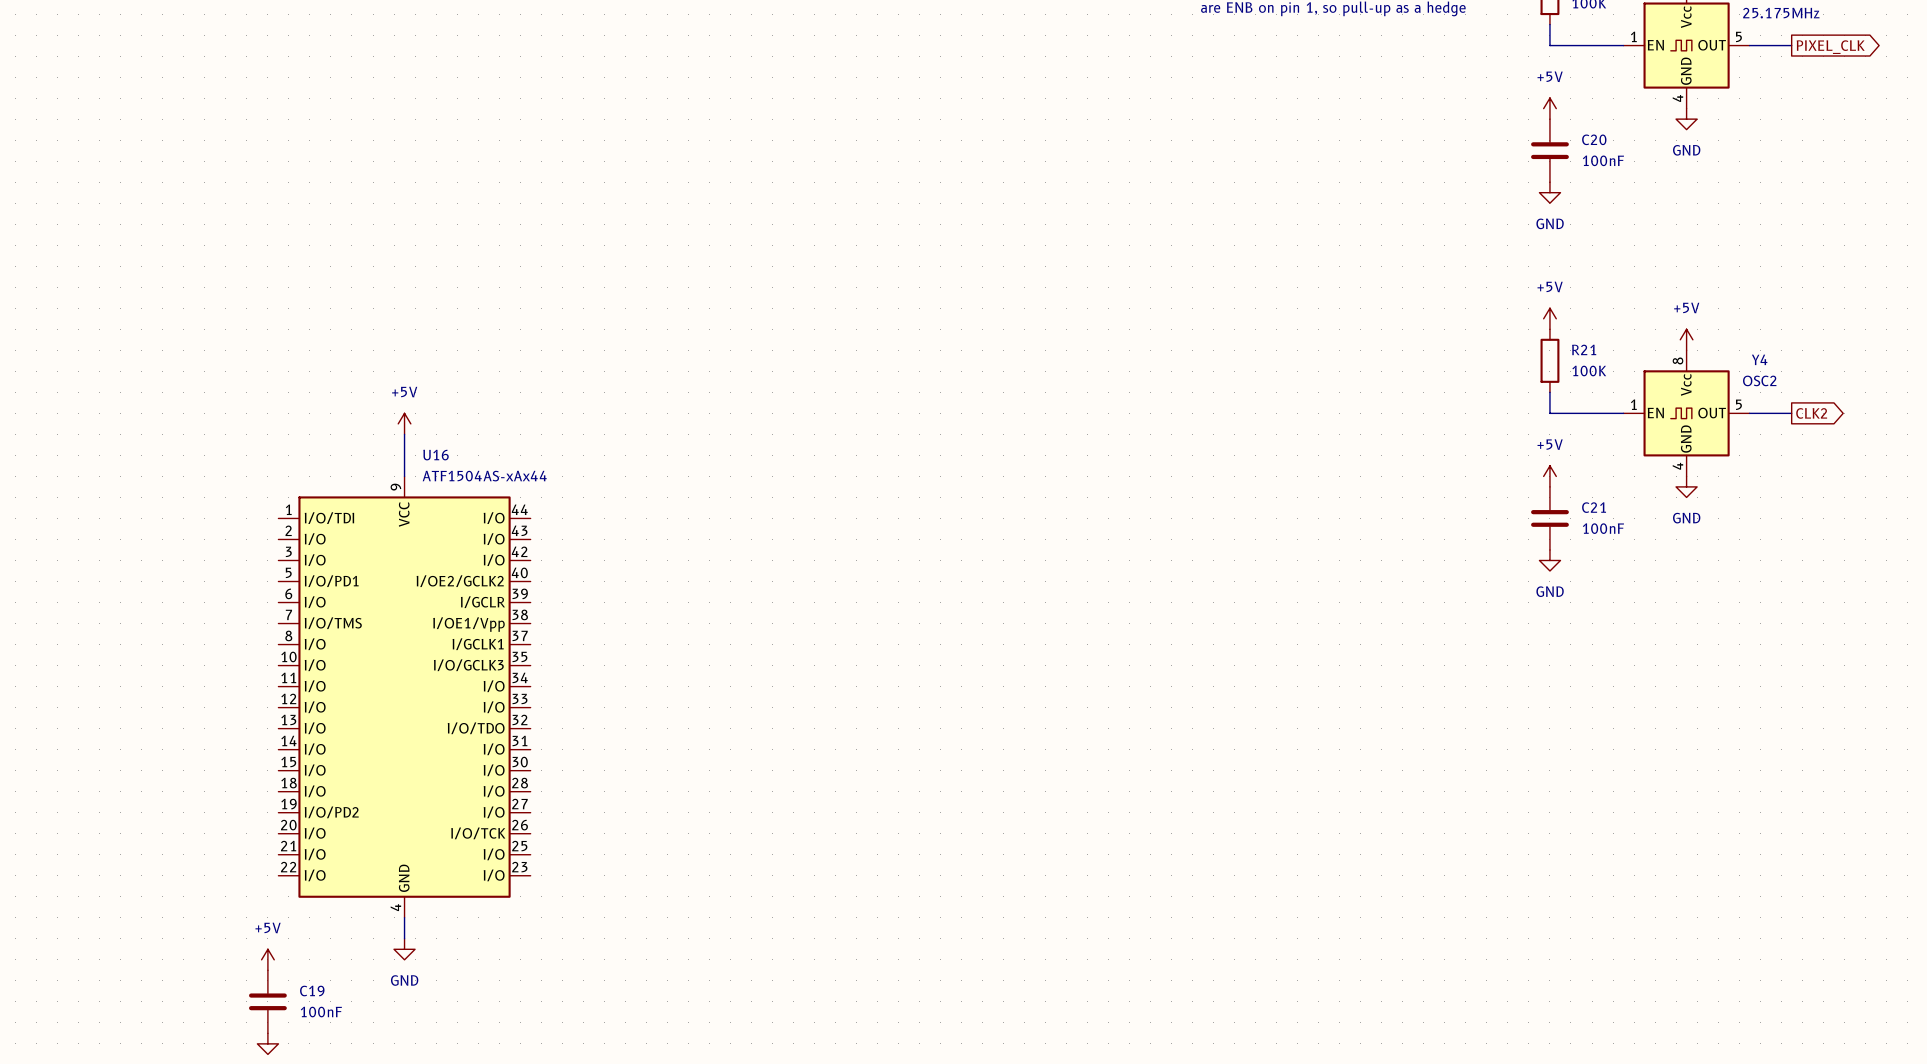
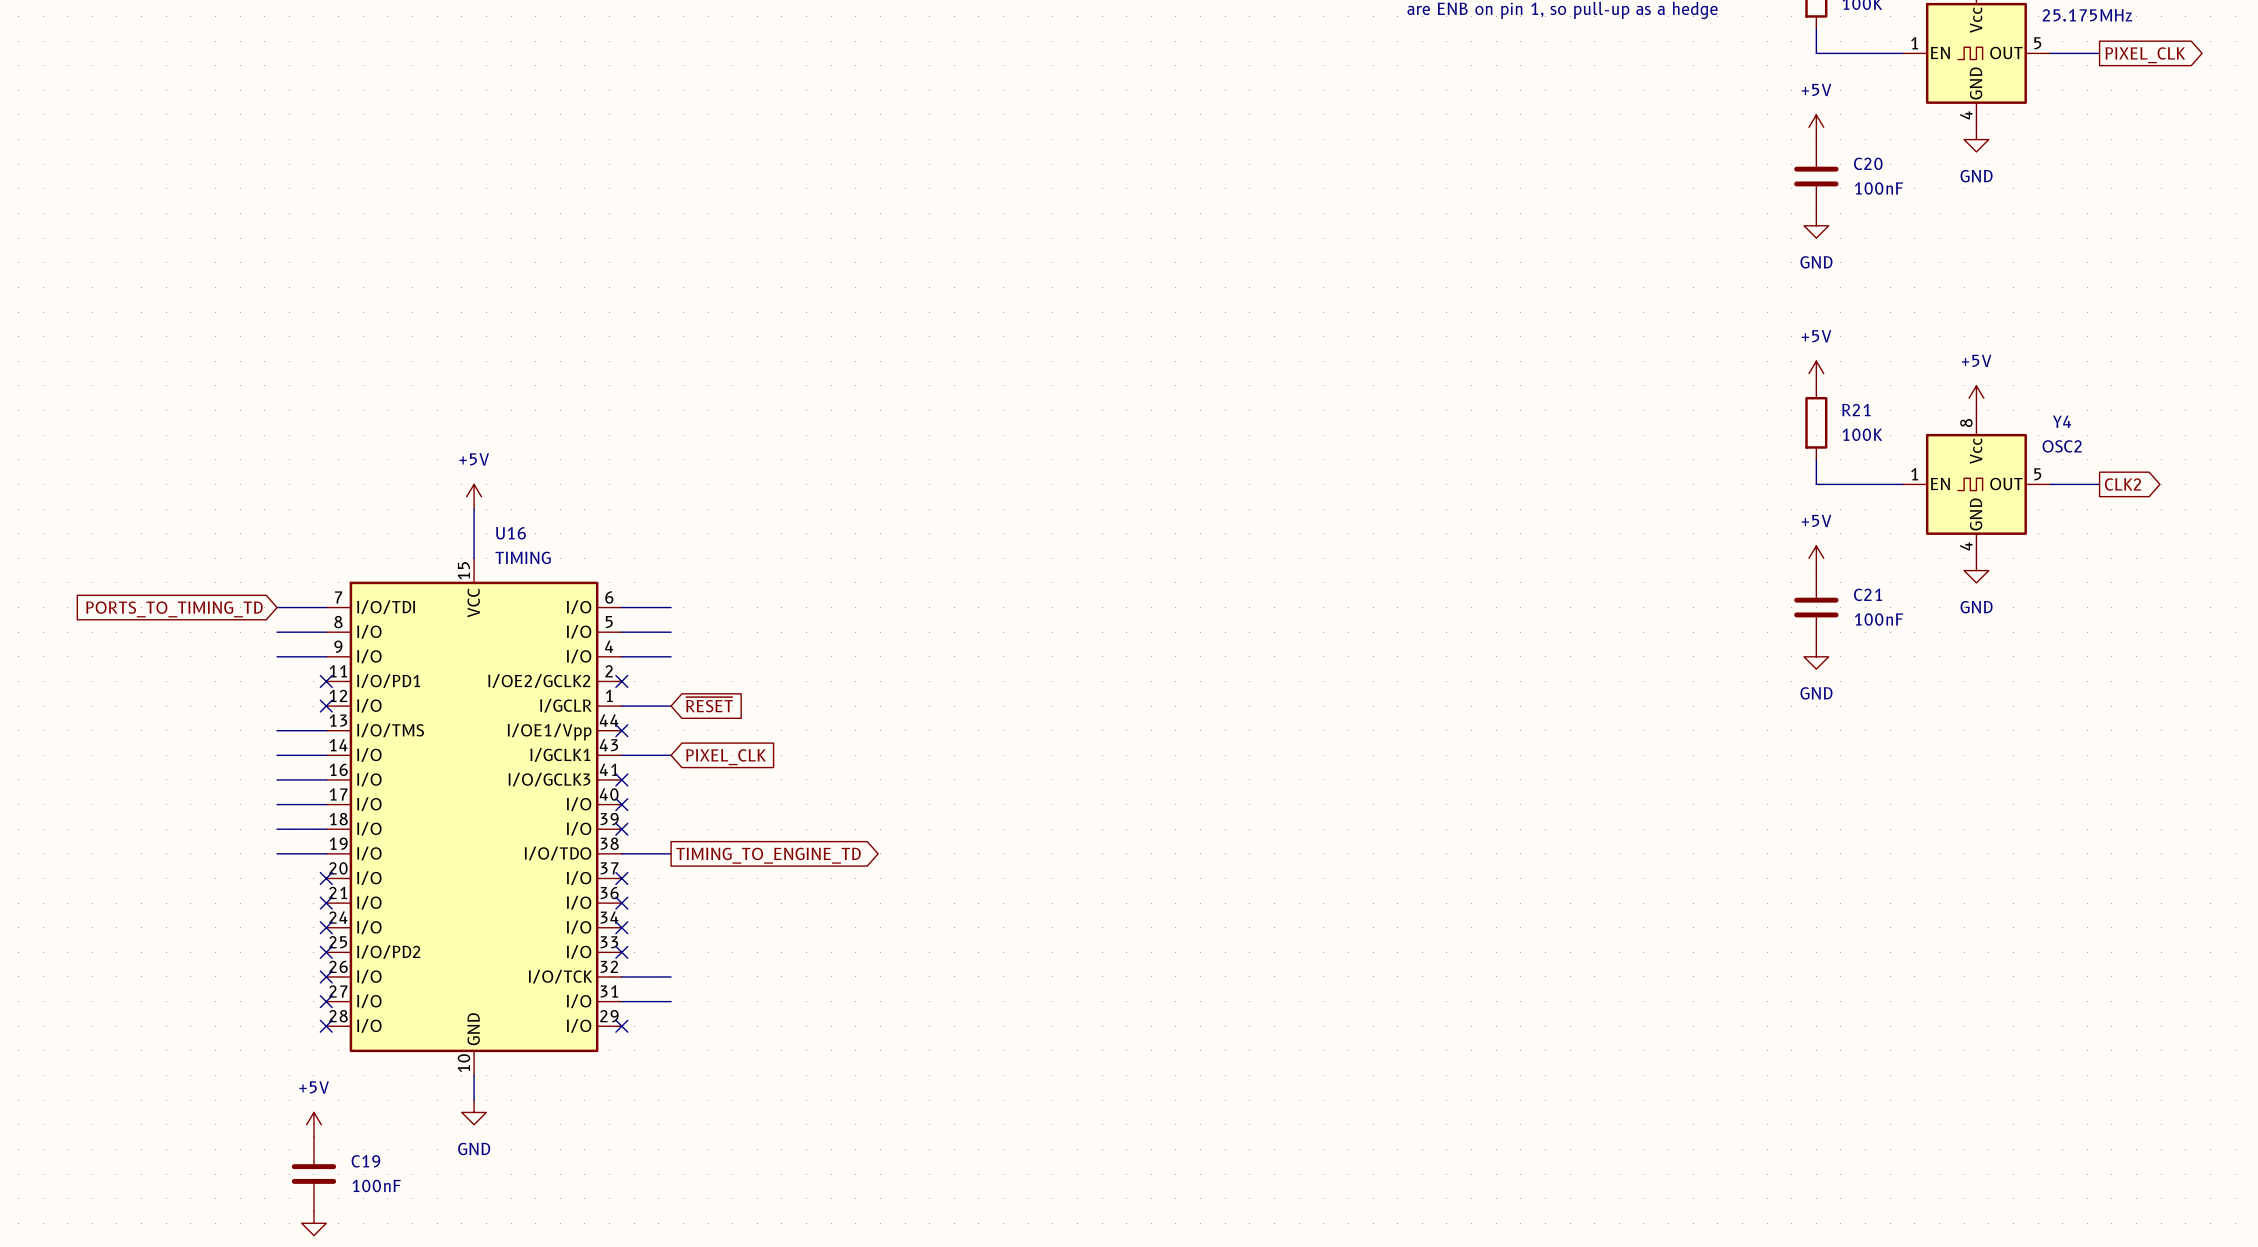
U16 symbol: [278, 476, 531, 918] -> [326, 558, 622, 1076]
U16 value: ATF1504AS-xAx44 (484, 476) -> TIMING (523, 557)
wire: none -> (277, 607) (326, 607)
wire: none -> (621, 607) (671, 607)
global label: none -> PORTS_TO_TIMING_TD (174, 609)
wire: none -> (277, 632) (326, 632)
wire: none -> (621, 632) (671, 632)
wire: none -> (277, 656) (326, 656)
wire: none -> (621, 656) (671, 656)
no-connect mark: none -> (326, 681)
no-connect mark: none -> (621, 681)
global label: none -> ~{RESET} (709, 704)
no-connect mark: none -> (326, 706)
wire: none -> (621, 706) (671, 706)
wire: none -> (277, 730) (326, 730)
no-connect mark: none -> (621, 730)
wire: none -> (277, 755) (326, 755)
wire: none -> (621, 755) (671, 755)
global label: none -> PIXEL_CLK (726, 757)
wire: none -> (277, 779) (326, 779)
no-connect mark: none -> (621, 779)
wire: none -> (277, 804) (326, 804)
no-connect mark: none -> (621, 804)
wire: none -> (277, 829) (326, 829)
no-connect mark: none -> (621, 829)
wire: none -> (277, 853) (326, 853)
wire: none -> (621, 853) (671, 853)
global label: none -> TIMING_TO_ENGINE_TD (768, 855)
no-connect mark: none -> (326, 878)
no-connect mark: none -> (621, 878)
no-connect mark: none -> (326, 903)
no-connect mark: none -> (621, 903)
no-connect mark: none -> (326, 927)
no-connect mark: none -> (621, 927)
no-connect mark: none -> (326, 952)
no-connect mark: none -> (621, 952)
no-connect mark: none -> (326, 976)
wire: none -> (621, 976) (671, 976)
no-connect mark: none -> (326, 1001)
wire: none -> (621, 1001) (671, 1001)
no-connect mark: none -> (326, 1026)
no-connect mark: none -> (621, 1026)

